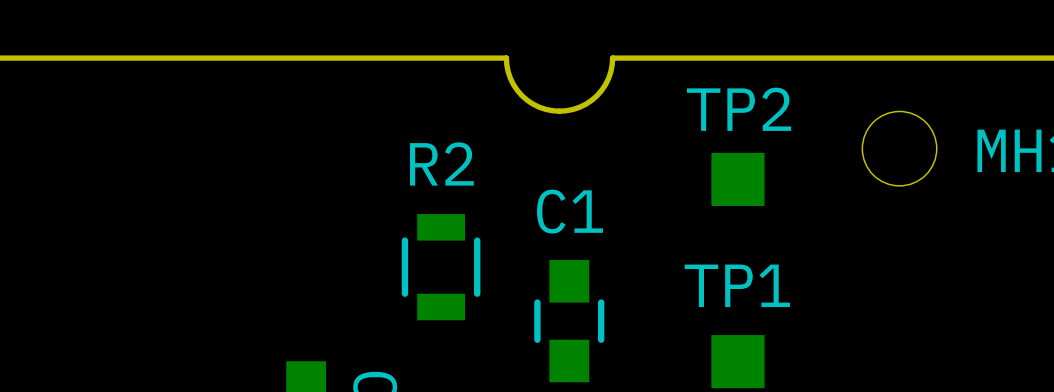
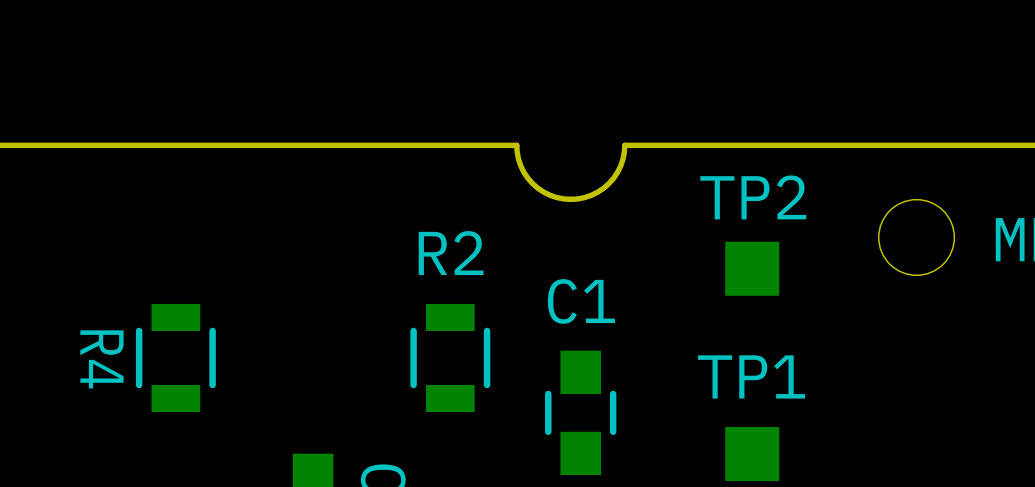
R4: none -> (175, 357)

